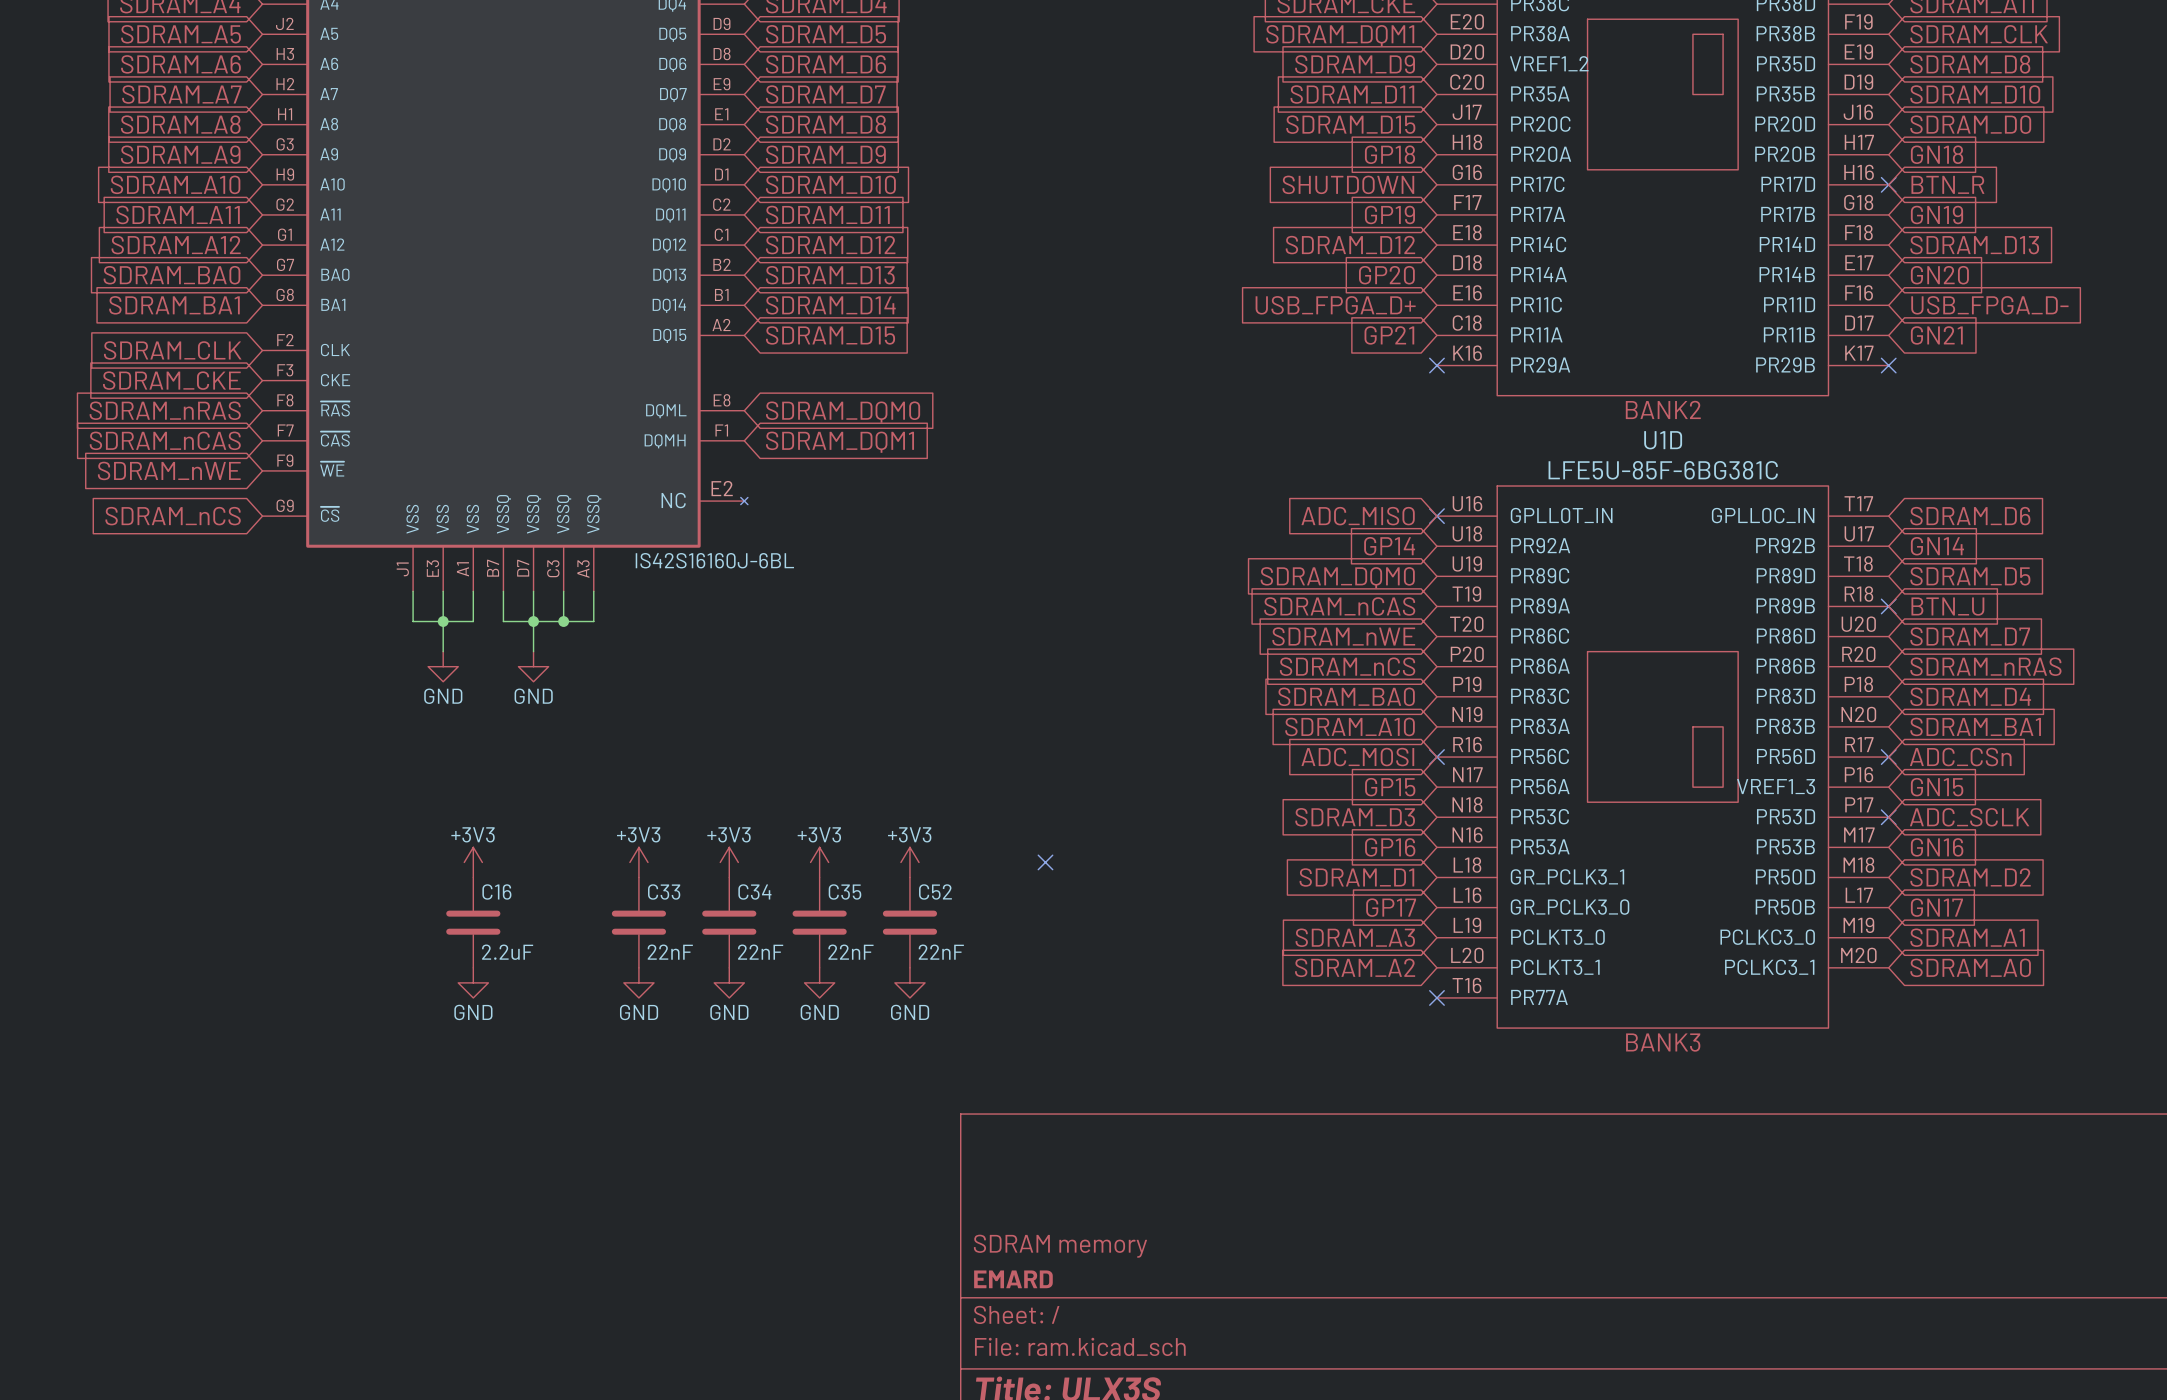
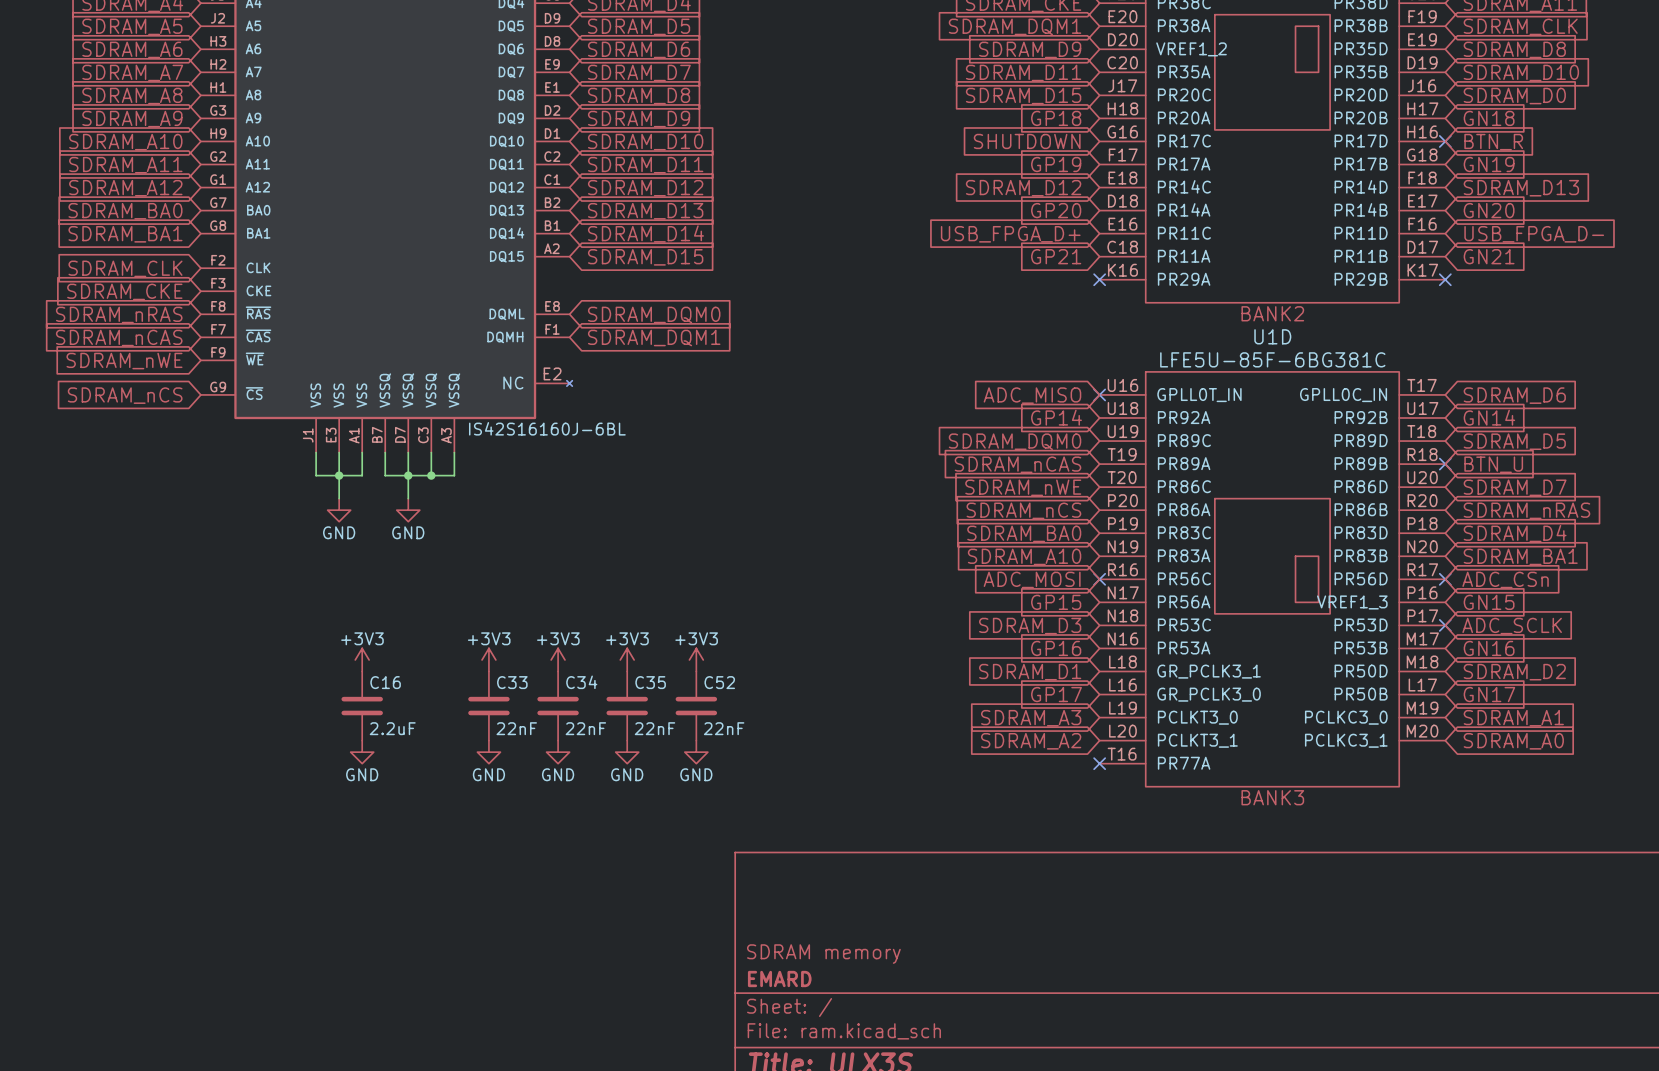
no-connect mark: (1045, 862) -> none

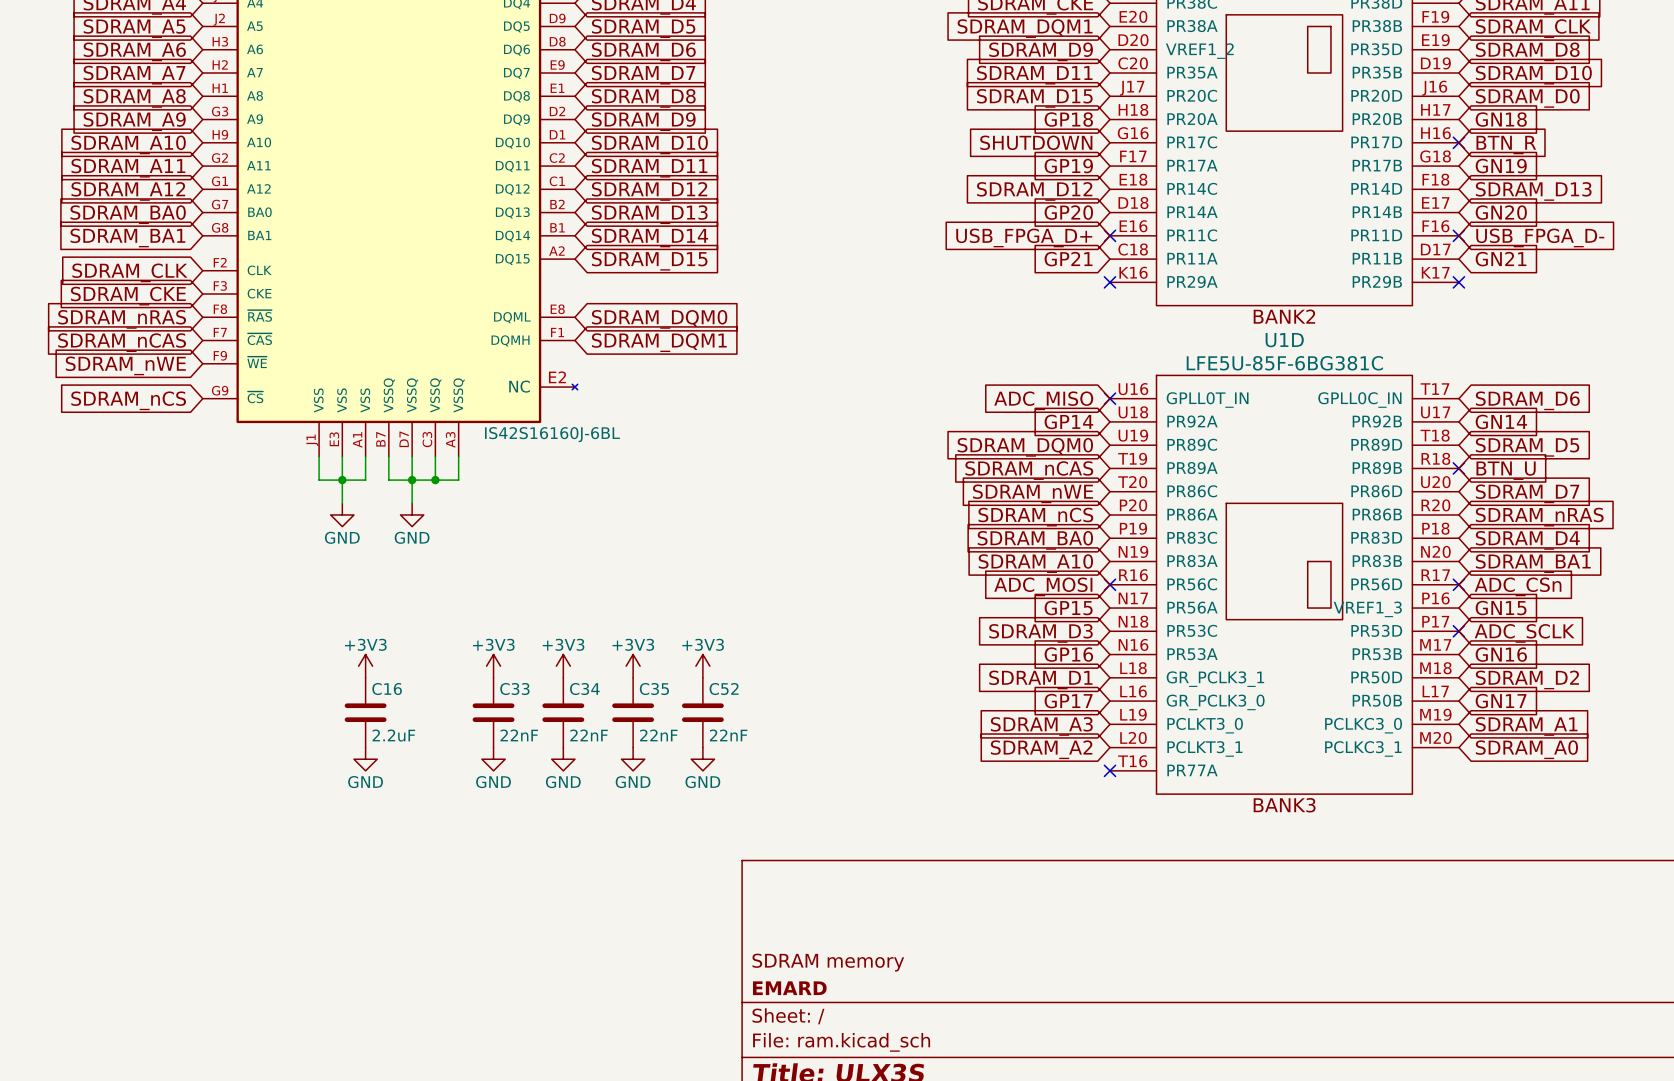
no-connect mark: none -> (1109, 235)
no-connect mark: none -> (1458, 235)

